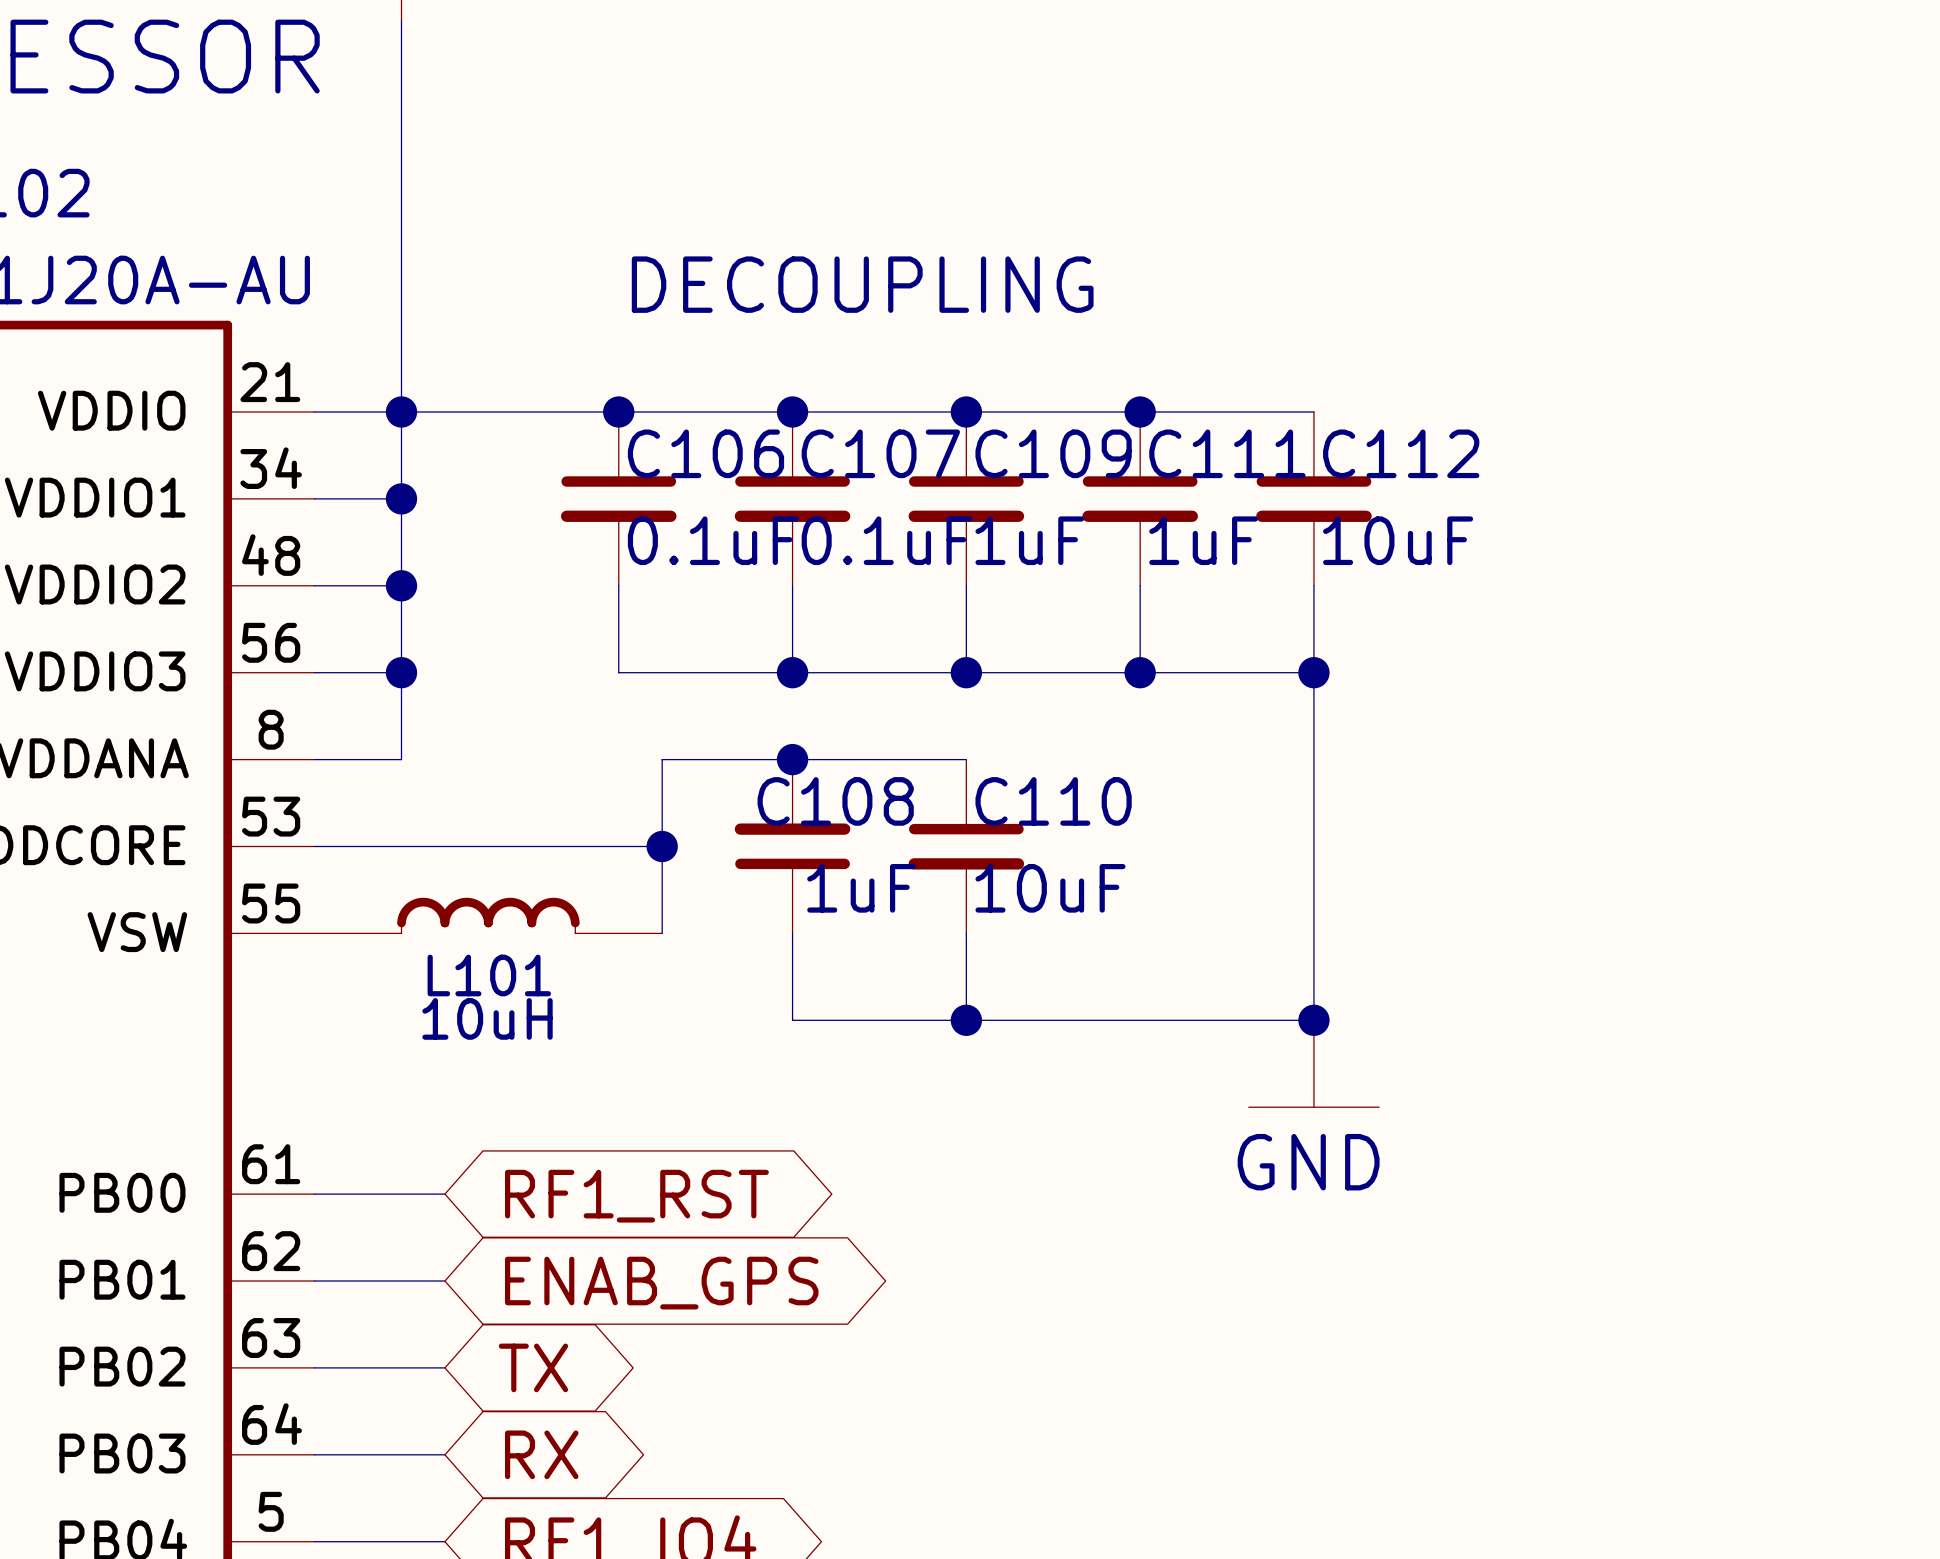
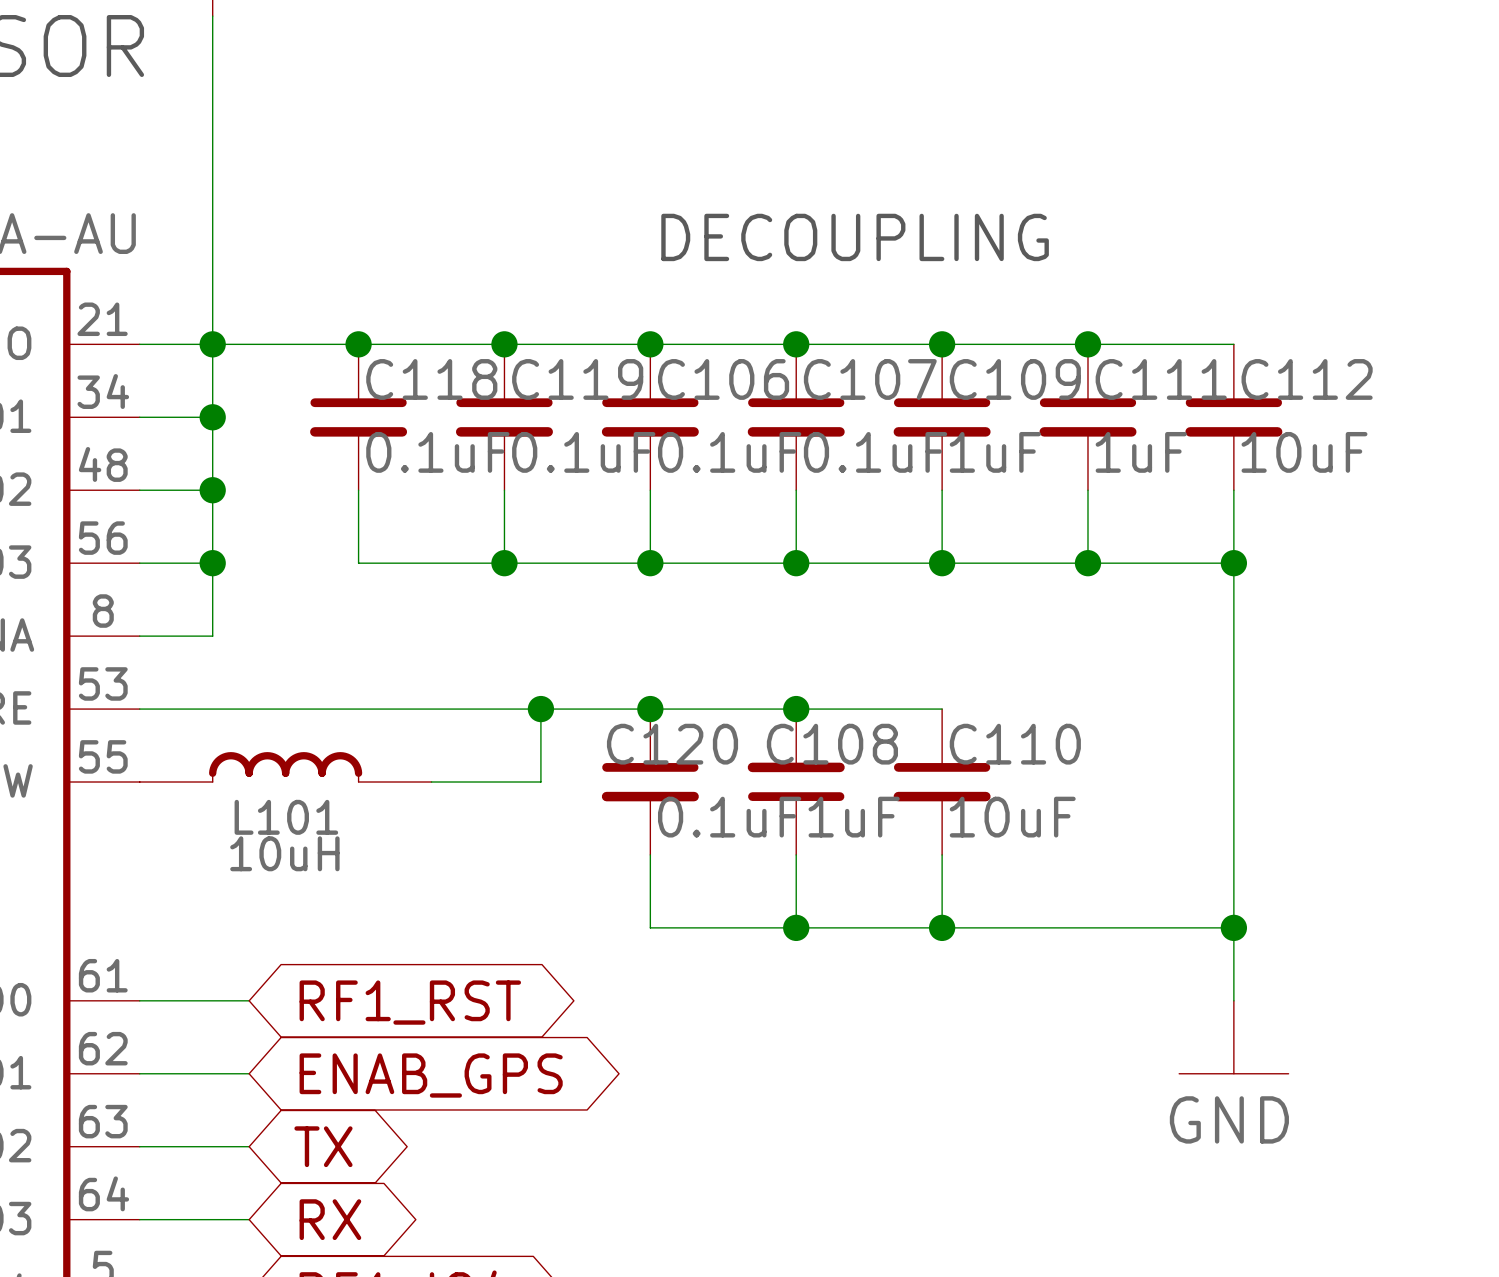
text position: DECOUPLING (862, 284) -> DECOUPLING (855, 237)
junction position: (618, 411) -> (358, 344)
junction position: (792, 411) -> (504, 344)
junction position: (966, 411) -> (650, 344)
junction position: (1140, 411) -> (796, 344)
junction: none -> (942, 344)
wire: none -> (978, 344) (1233, 344)
junction: none -> (1087, 344)
C118: none -> 0.1uF (358, 417)
C106 position: (618, 498) -> (650, 417)
C119: none -> 0.1uF (504, 417)
C107 position: (792, 498) -> (796, 417)
C109 position: (966, 498) -> (942, 417)
C111 position: (1140, 498) -> (1087, 417)
C112 position: (1313, 498) -> (1233, 417)
wire: (618, 585) (618, 672) -> (358, 490) (358, 563) (395, 563)
wire: none -> (504, 490) (504, 563)
wire: (792, 585) (792, 672) -> (650, 490) (650, 563)
wire: (966, 585) (966, 672) -> (796, 490) (796, 563)
wire: (1140, 585) (1140, 672) -> (942, 490) (942, 563)
wire: (1313, 585) (1313, 1020) (792, 1020) (792, 933) -> none
wire: none -> (1087, 490) (1087, 563)
wire: none -> (1233, 490) (1233, 1000)
junction position: (792, 672) -> (504, 563)
junction position: (966, 672) -> (650, 563)
junction position: (1140, 672) -> (796, 563)
wire: none -> (978, 563) (1233, 563)
junction position: (1313, 672) -> (942, 563)
junction: none -> (1087, 563)
junction: none -> (1233, 563)
junction: (792, 759) -> none
wire: (966, 759) (662, 759) (662, 933) -> (540, 709) (540, 782) (431, 782)
wire: none -> (431, 709) (942, 709)
junction: (662, 846) -> none
junction: none -> (540, 709)
C108 position: (792, 846) -> (796, 782)
junction: none -> (650, 709)
C110 position: (966, 846) -> (942, 782)
junction: none -> (796, 709)
C120: none -> 0.1uF (650, 782)
wire: (966, 933) (966, 1020) -> (796, 854) (796, 927)
wire: none -> (650, 854) (650, 927) (1233, 927)
junction: (966, 1020) -> none
wire: none -> (942, 854) (942, 927)
junction position: (1313, 1020) -> (942, 927)
power symbol position: GND (1313, 1063) -> GND (1233, 1037)
junction: none -> (796, 927)
junction: none -> (1233, 927)

